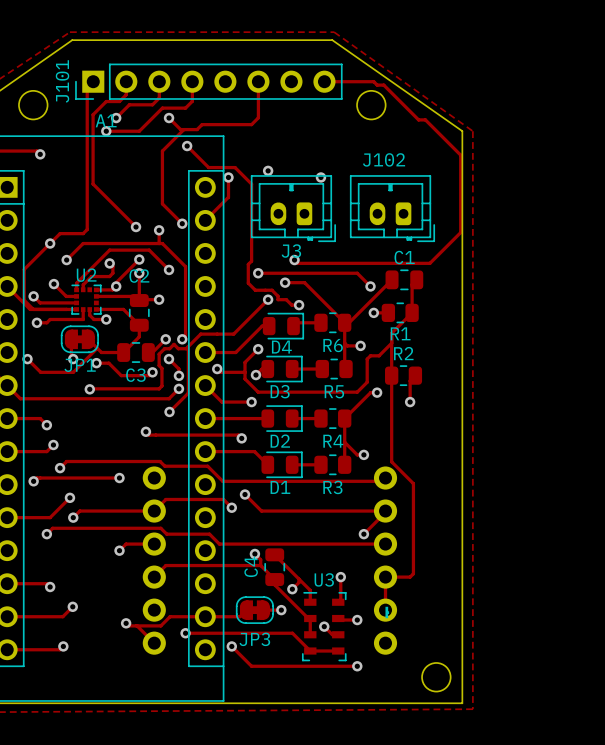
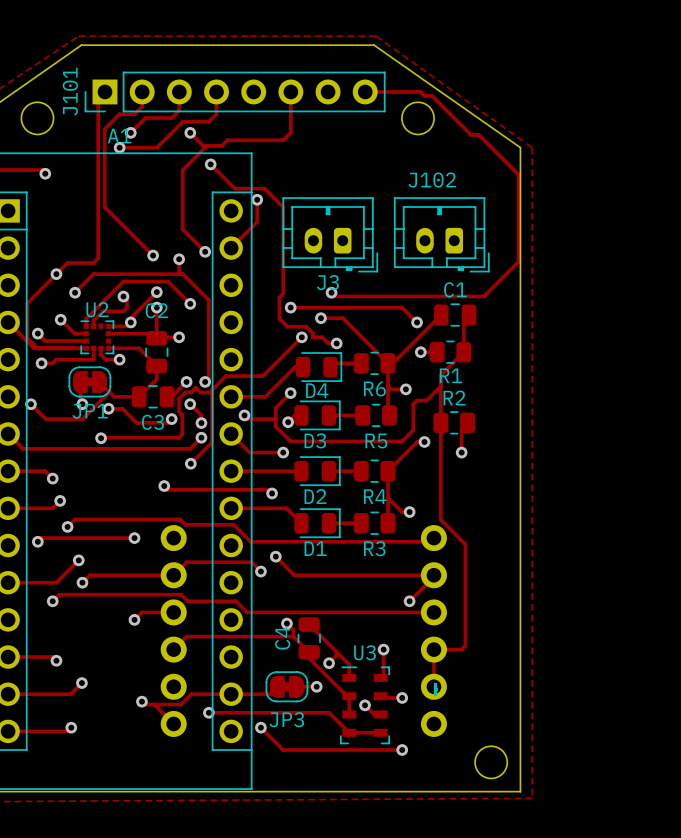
via: (268, 170) -> none
via: (320, 177) -> none

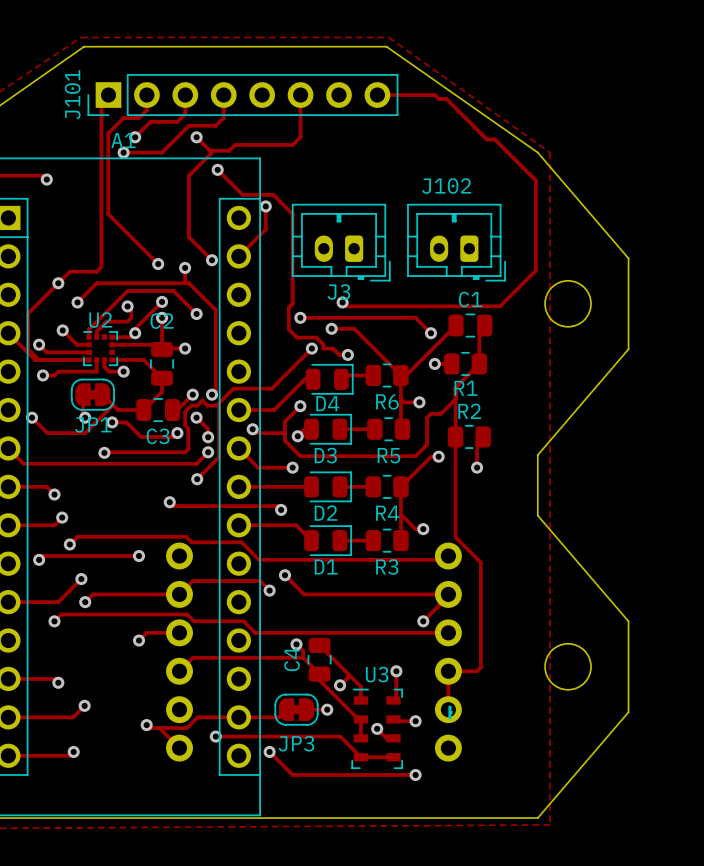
round board edge: [20, 101, 55, 136] -> none
round board edge: [401, 101, 435, 136] -> none
board edge: (520, 147) (520, 440) -> (537, 152) (628, 258) (628, 349) (537, 455)
round board edge: none -> [544, 280, 592, 328]
board edge: (520, 498) (520, 791) -> (537, 515) (628, 621) (628, 712) (537, 818)
round board edge: none -> [544, 643, 592, 691]
round board edge: [474, 745, 509, 780] -> none

